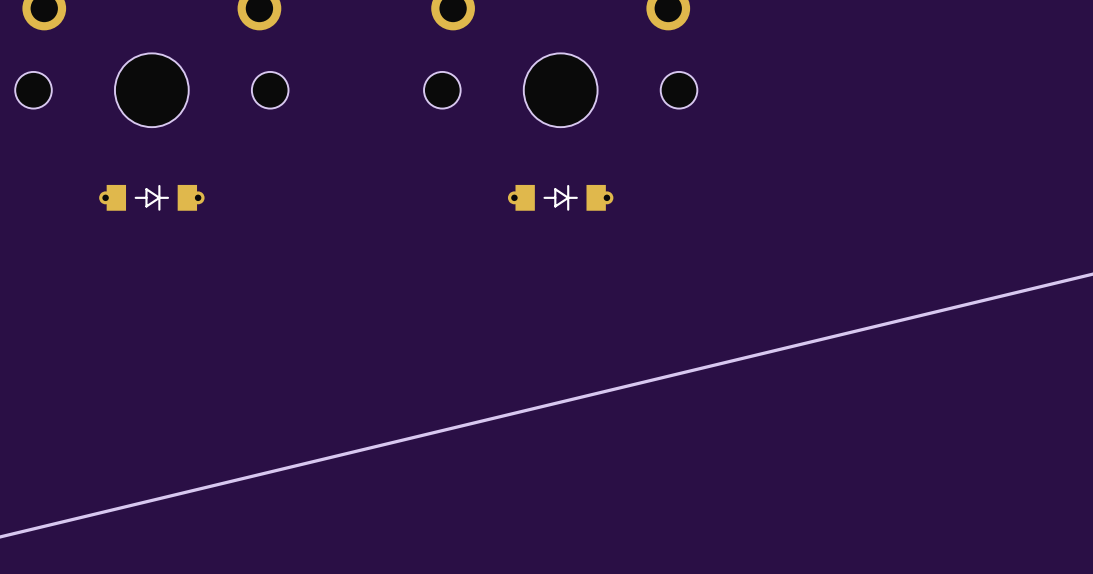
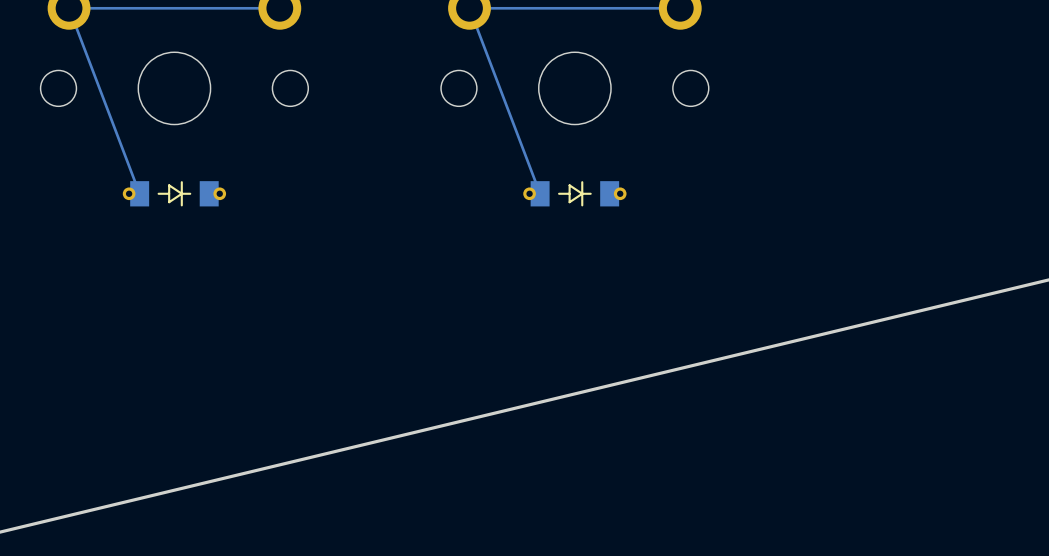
track: none -> (279, 8) (69, 8) (139, 193)
track: none -> (680, 8) (469, 8) (540, 193)

